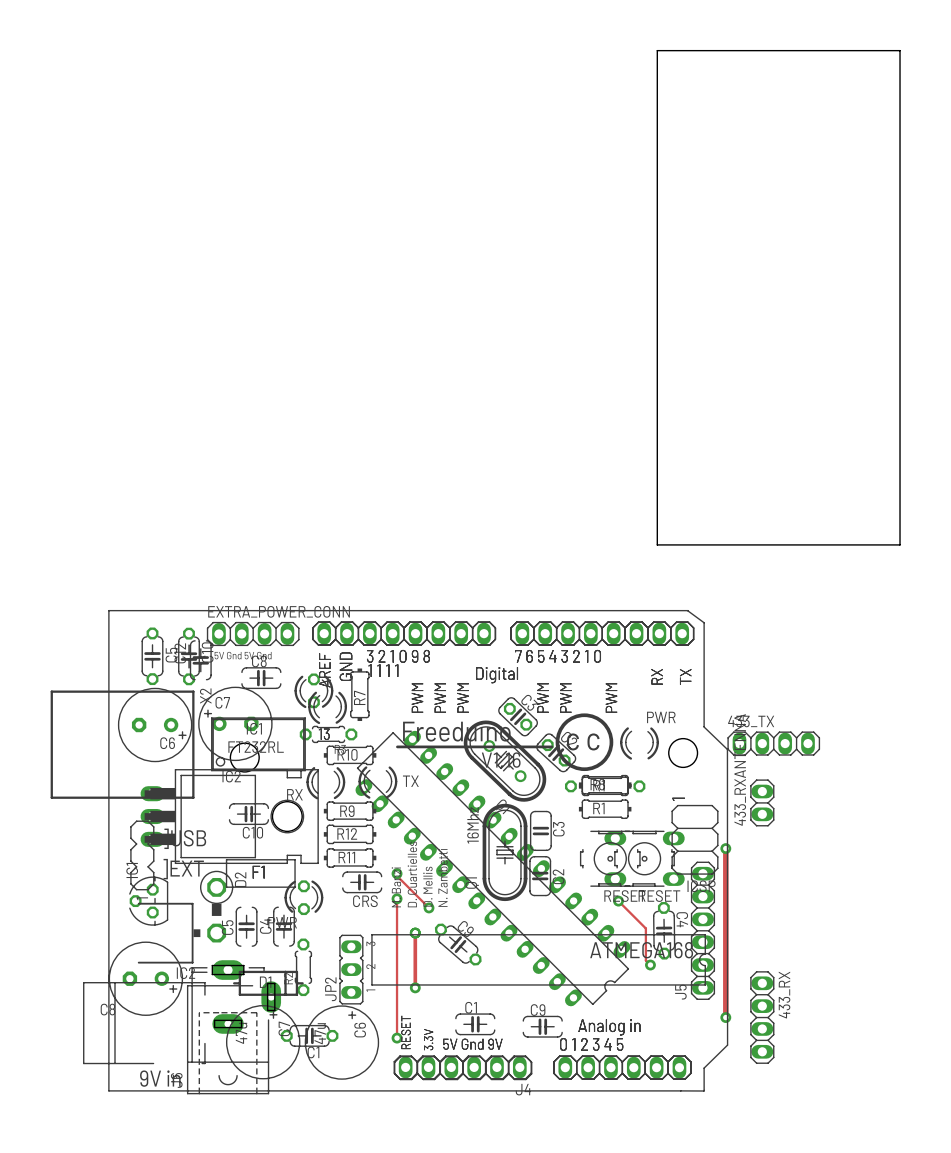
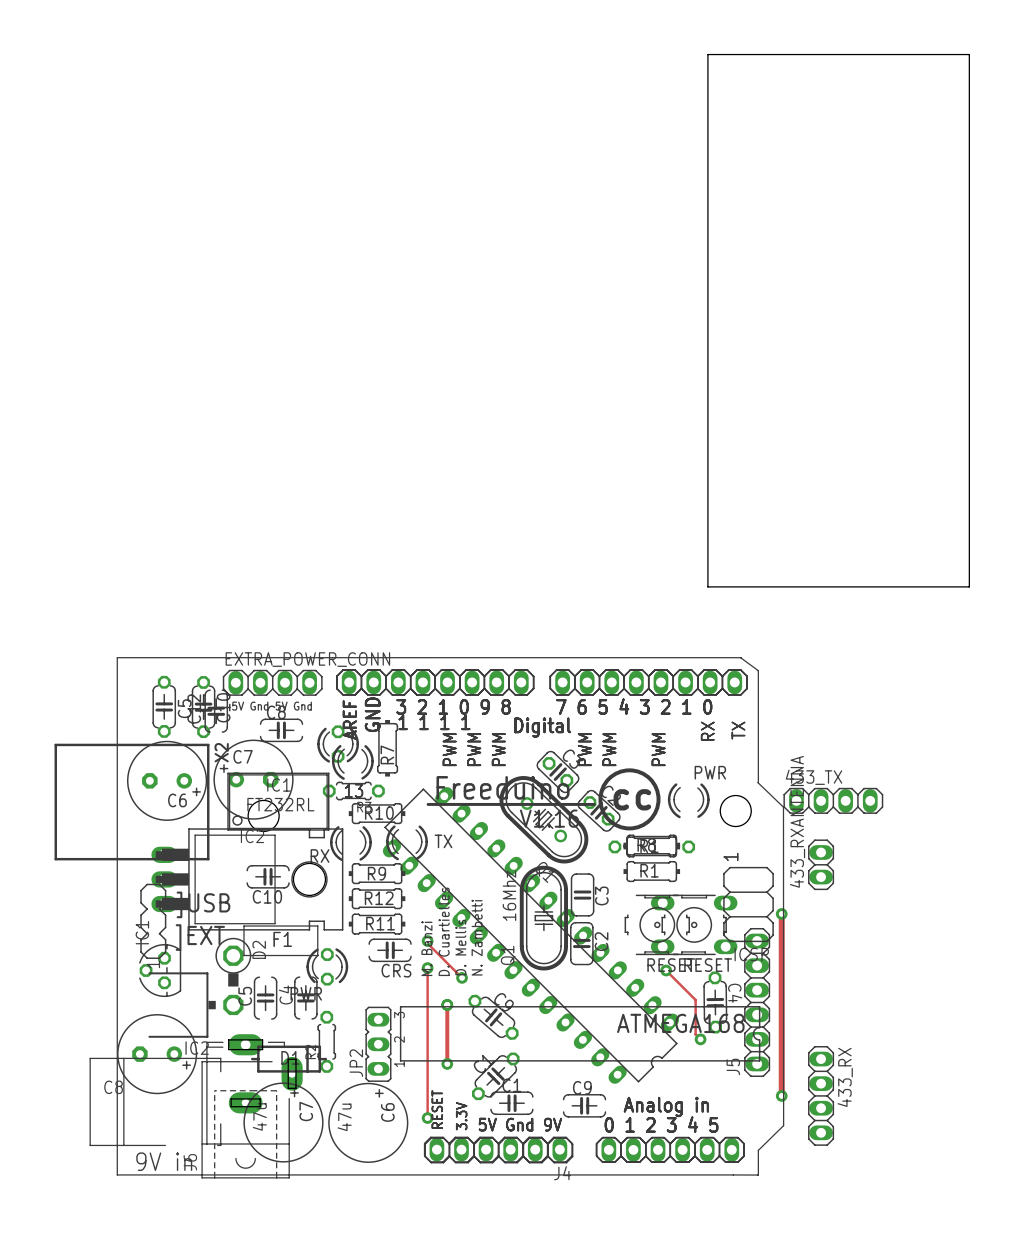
C1 rotation: 0° (309, 1035) -> 135° clockwise (495, 1076)
C1 position: (309, 1035) -> (495, 1076)

